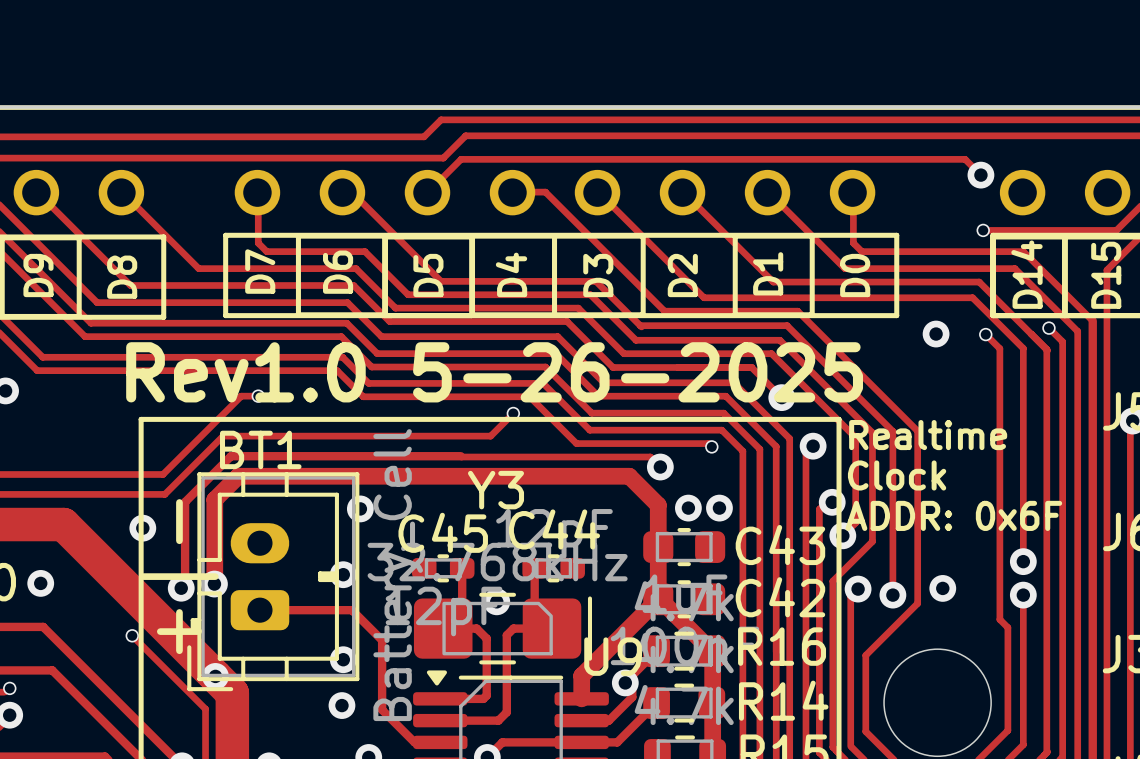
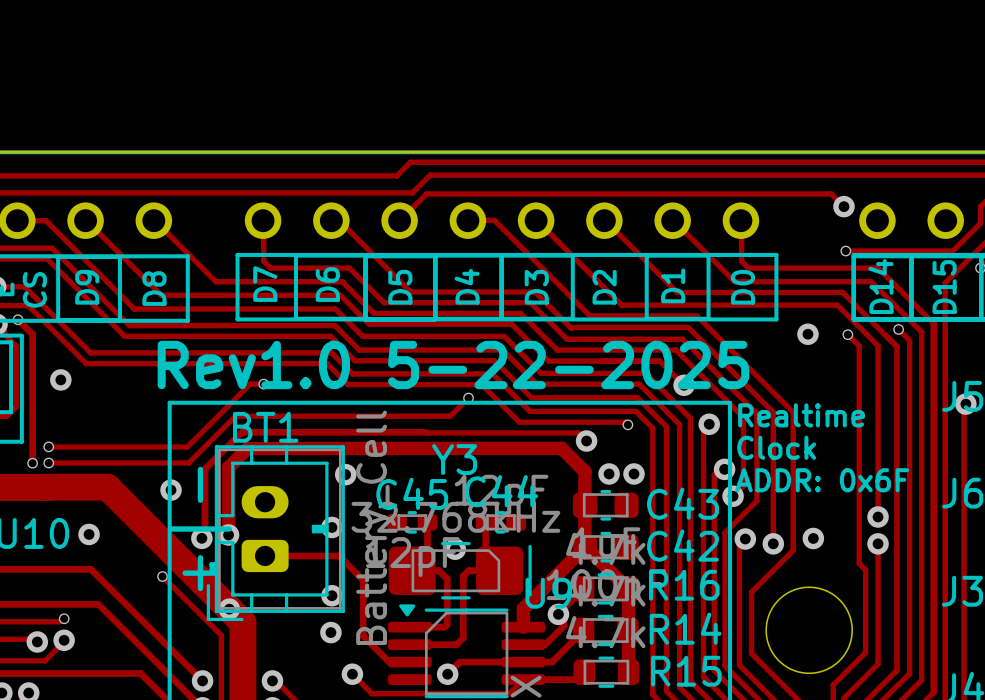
text: Rev1.0 5-26-2025 (494, 372) -> Rev1.0 5-22-2025 (453, 364)

